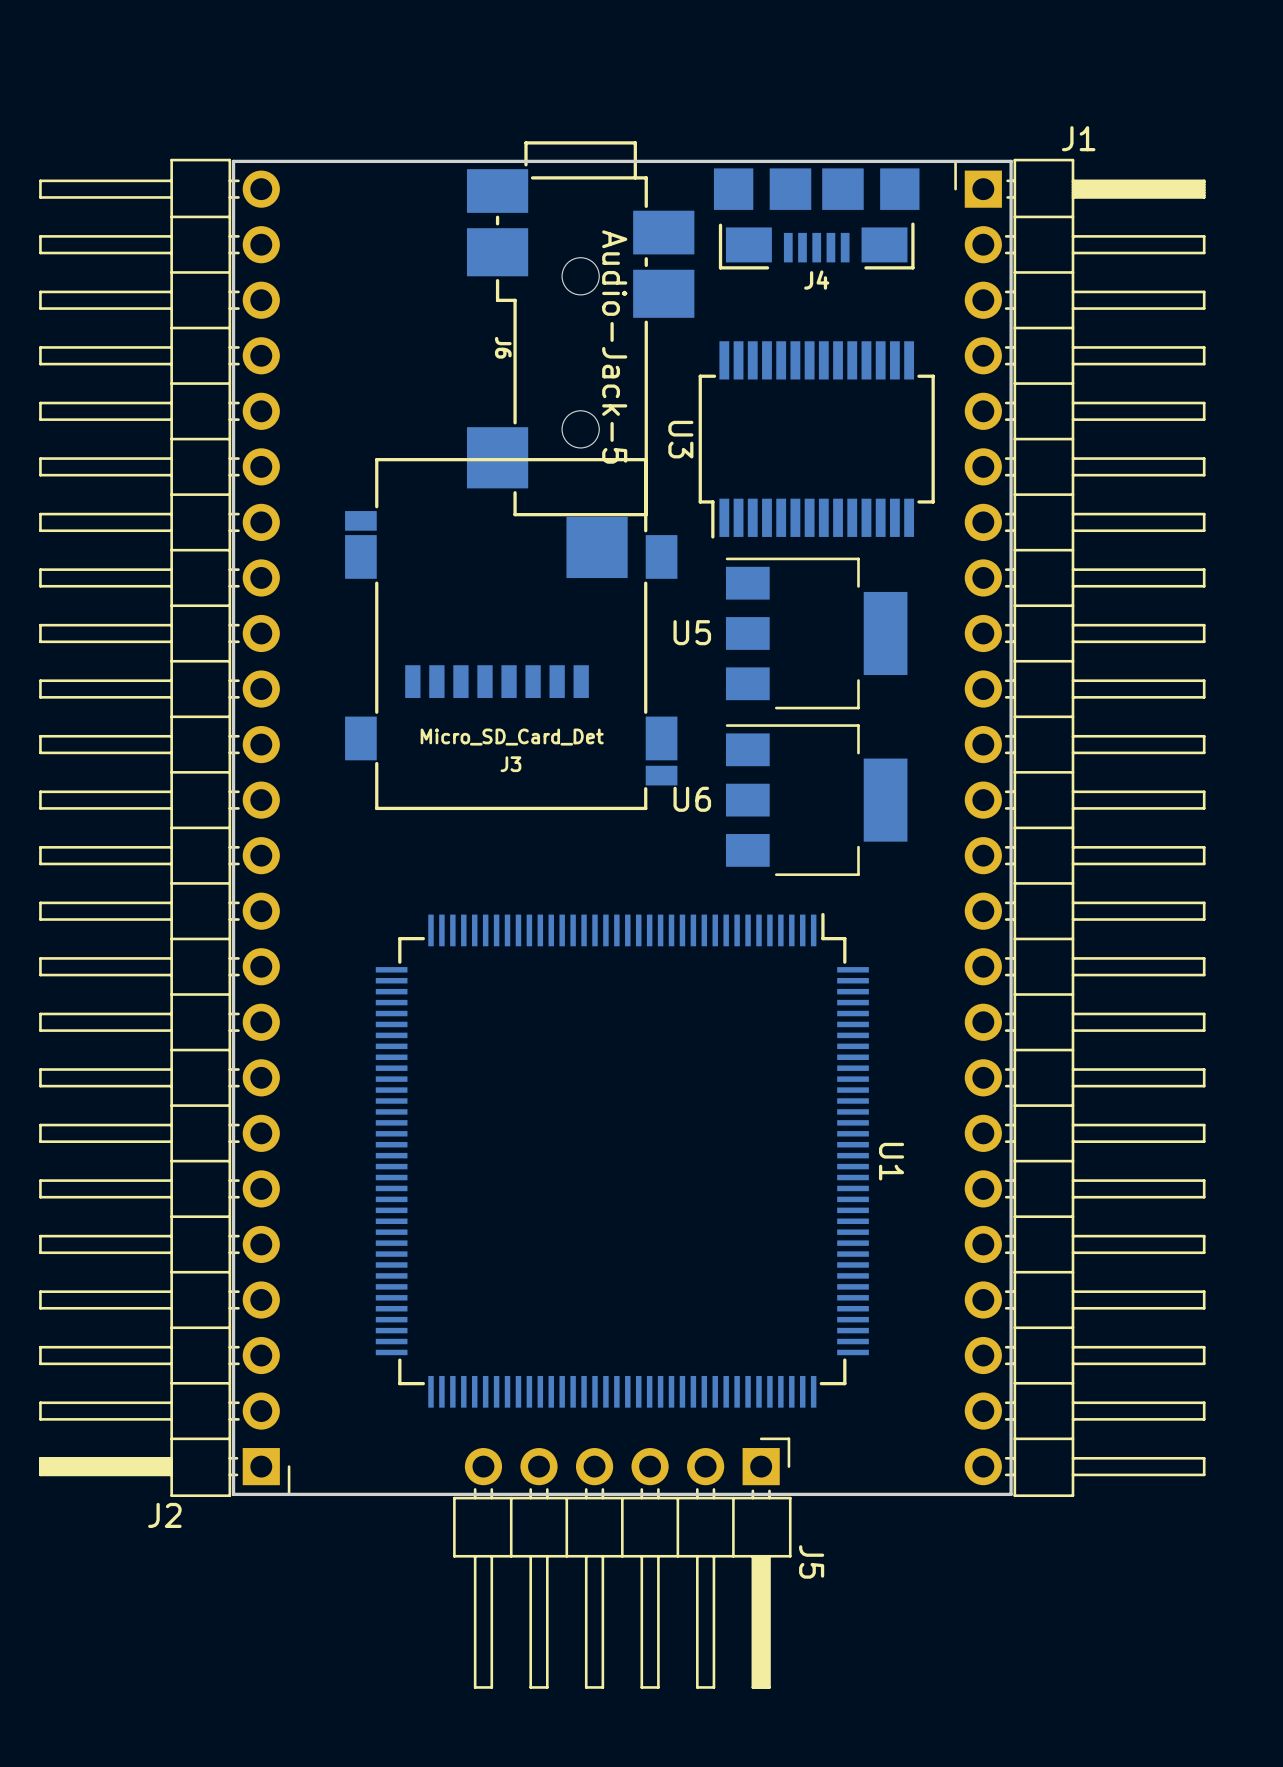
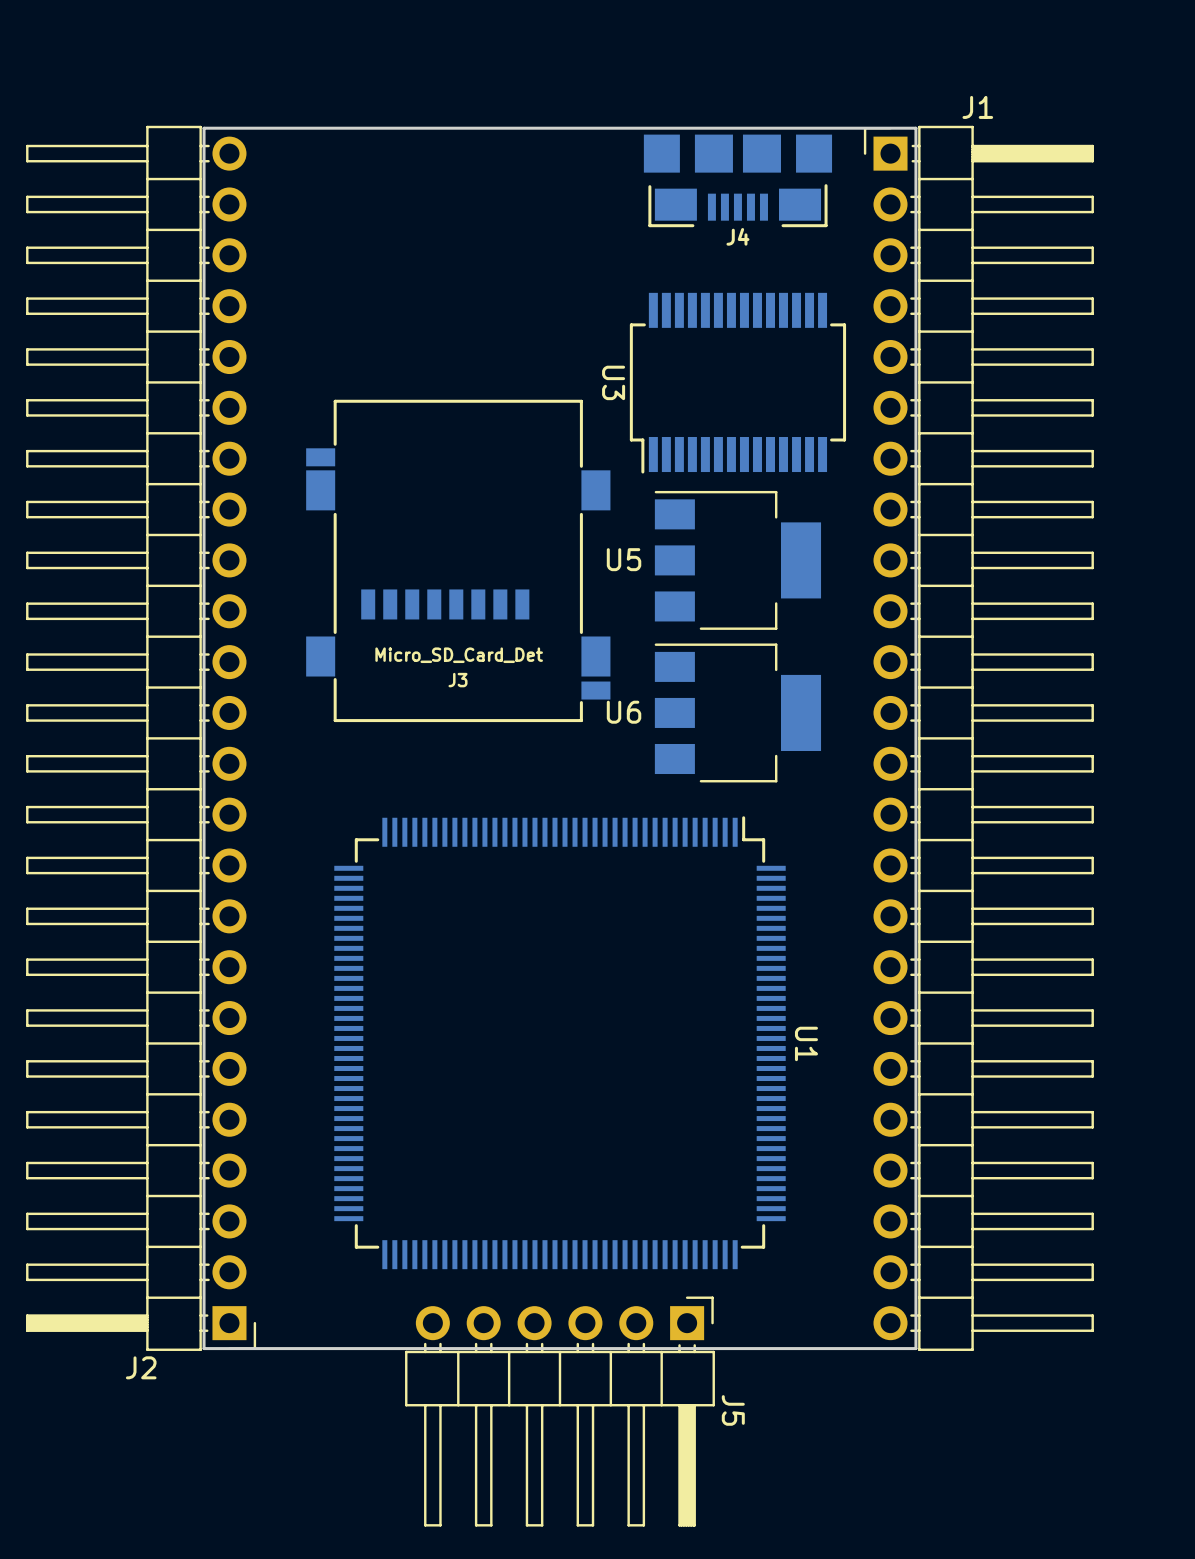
J6: Audio-Jack-5 (580, 359) -> none

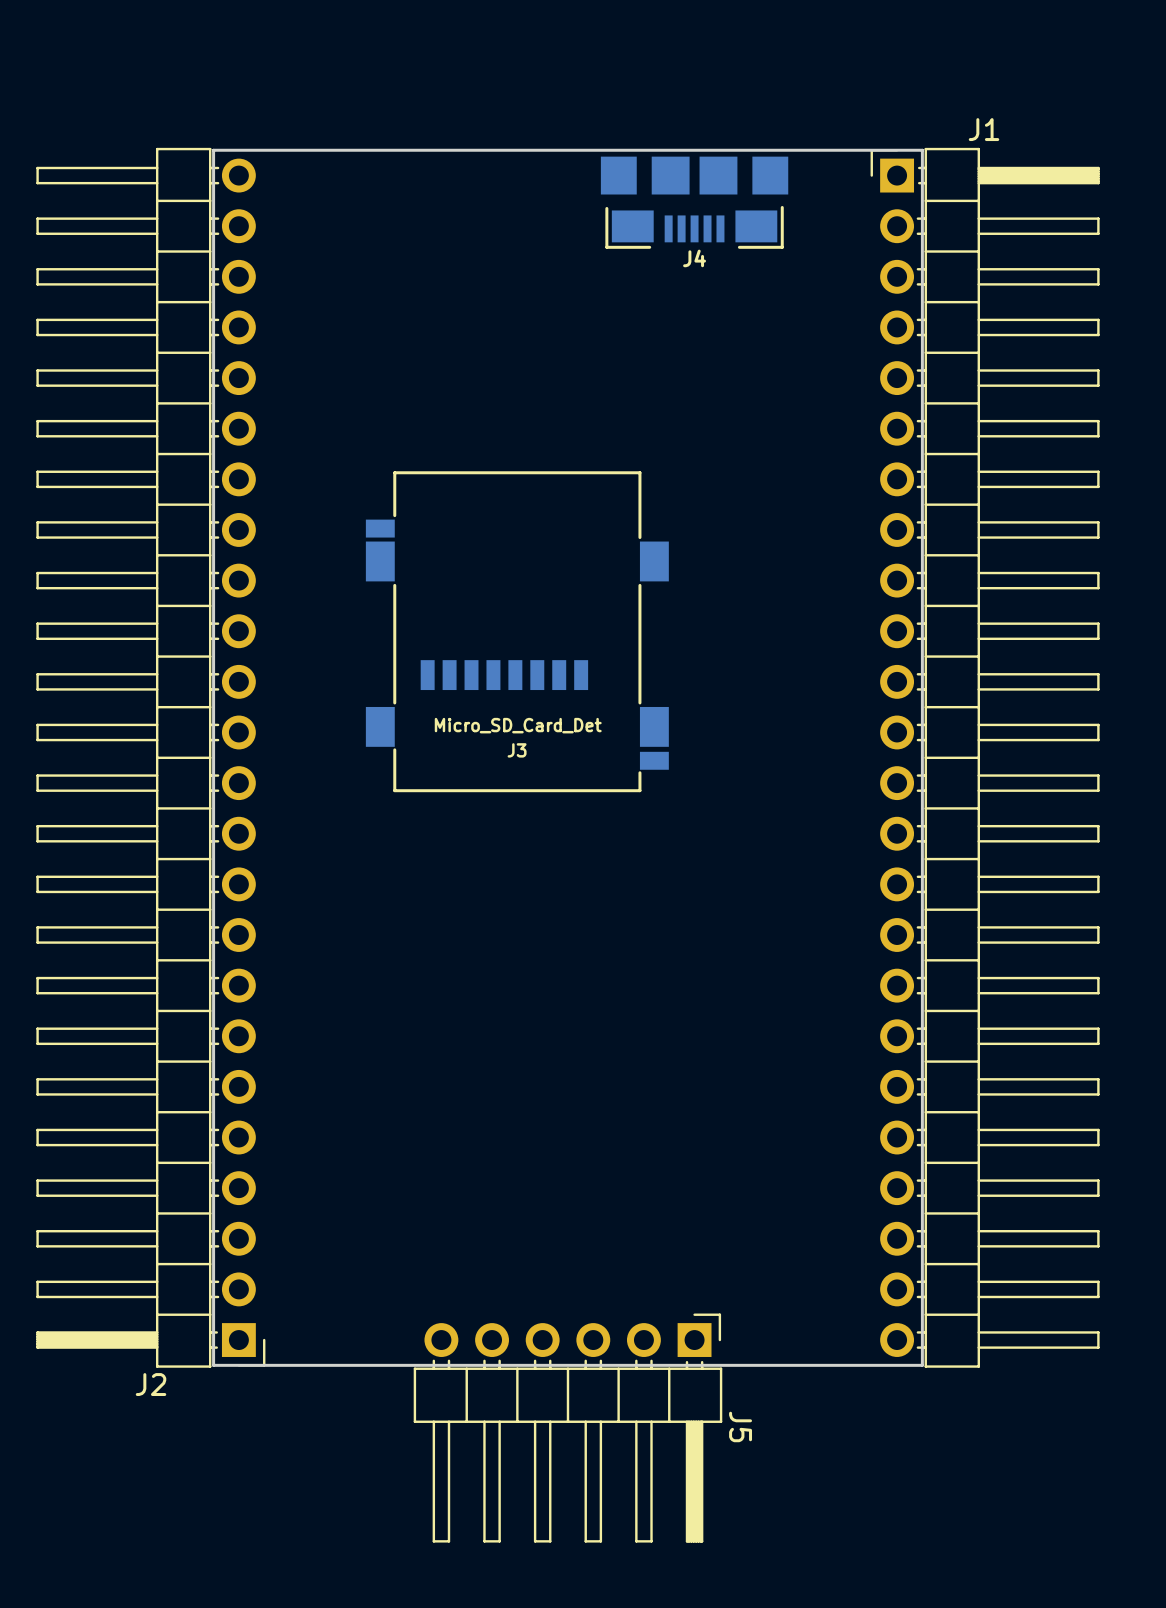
J4 position: (737, 180) -> (694, 202)
U3: (737, 383) -> none
J3 position: (458, 560) -> (517, 631)
U5: (737, 560) -> none
U6: (737, 712) -> none
U1: (559, 1042) -> none

